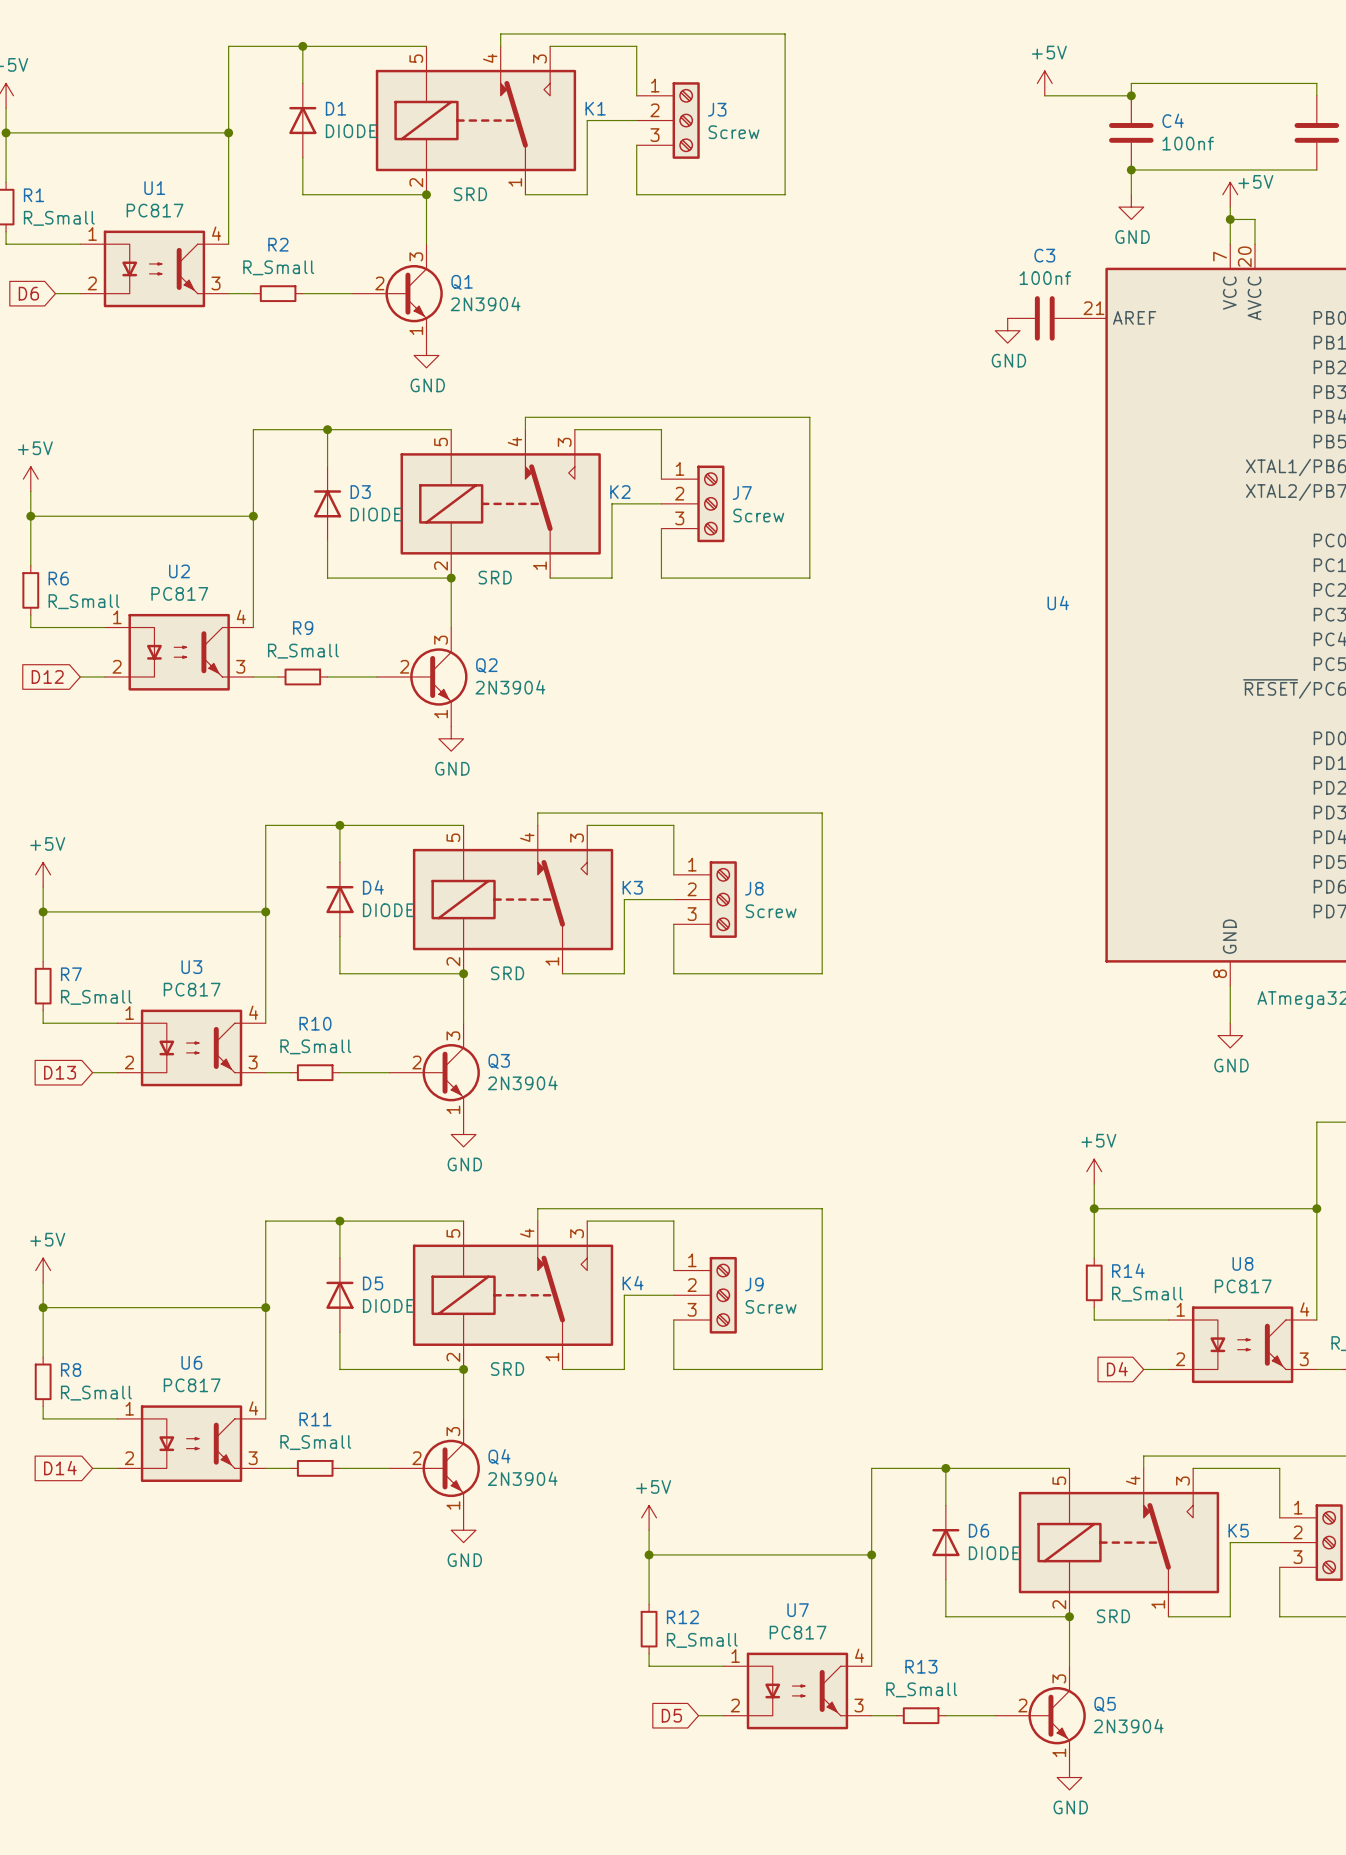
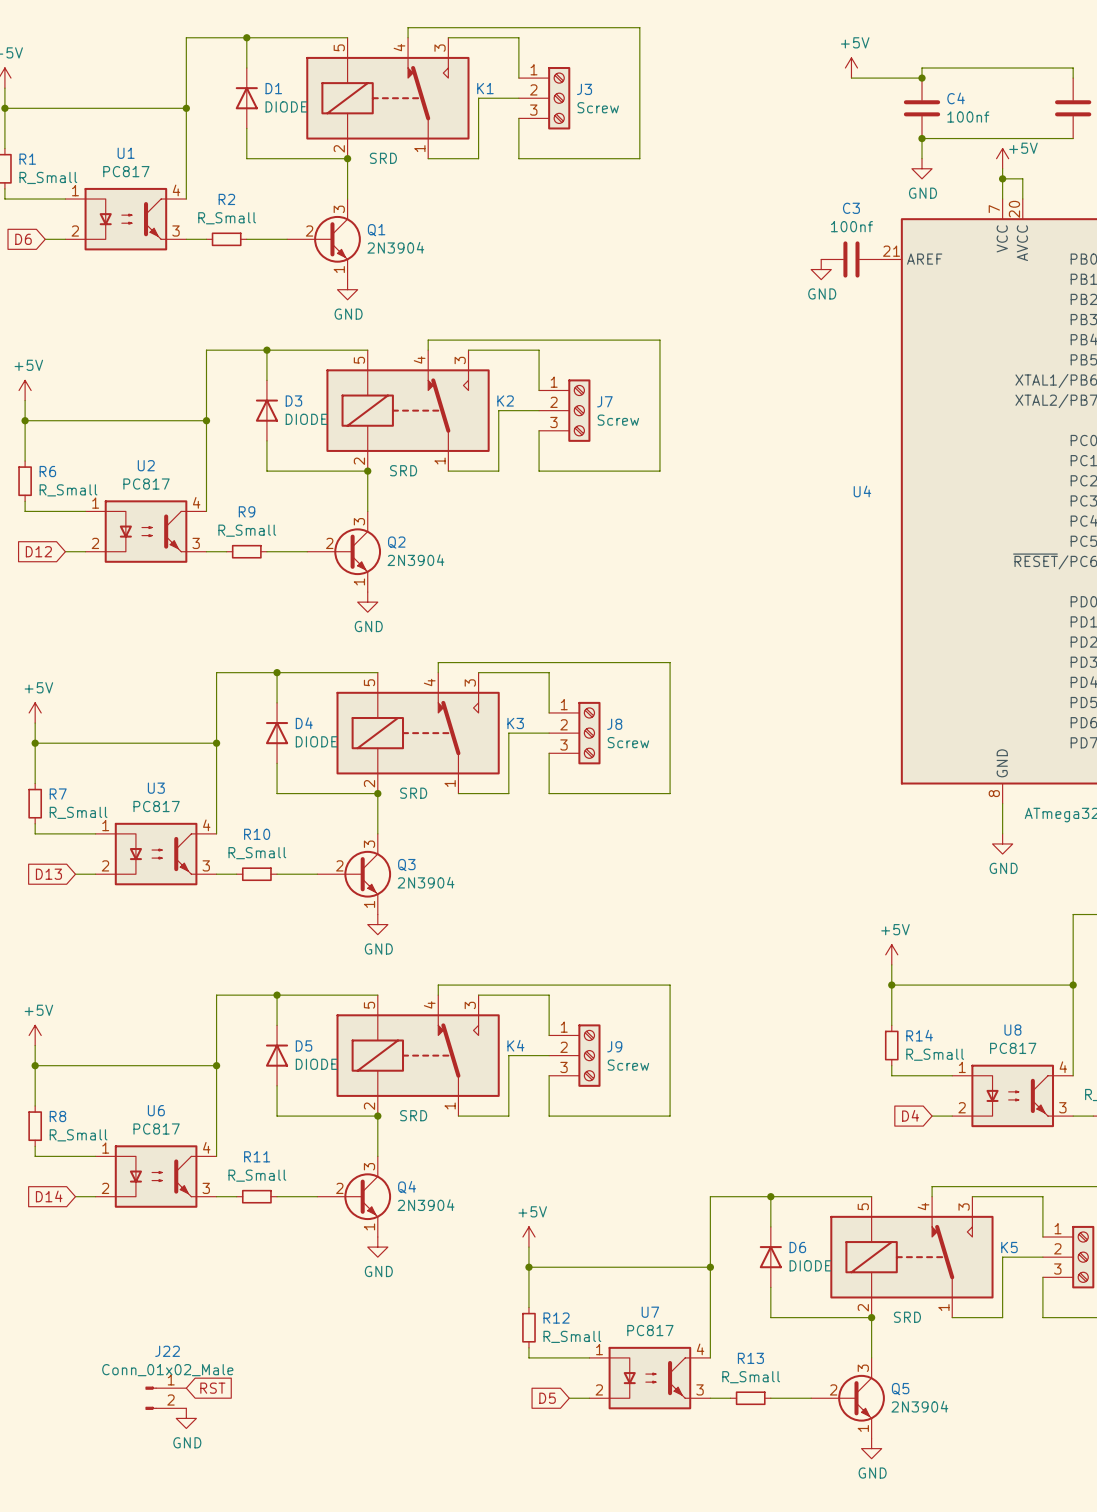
global label: none -> RST (212, 1388)
J22: none -> Conn_01x02_Male (165, 1398)
power symbol: none -> GND (186, 1418)

